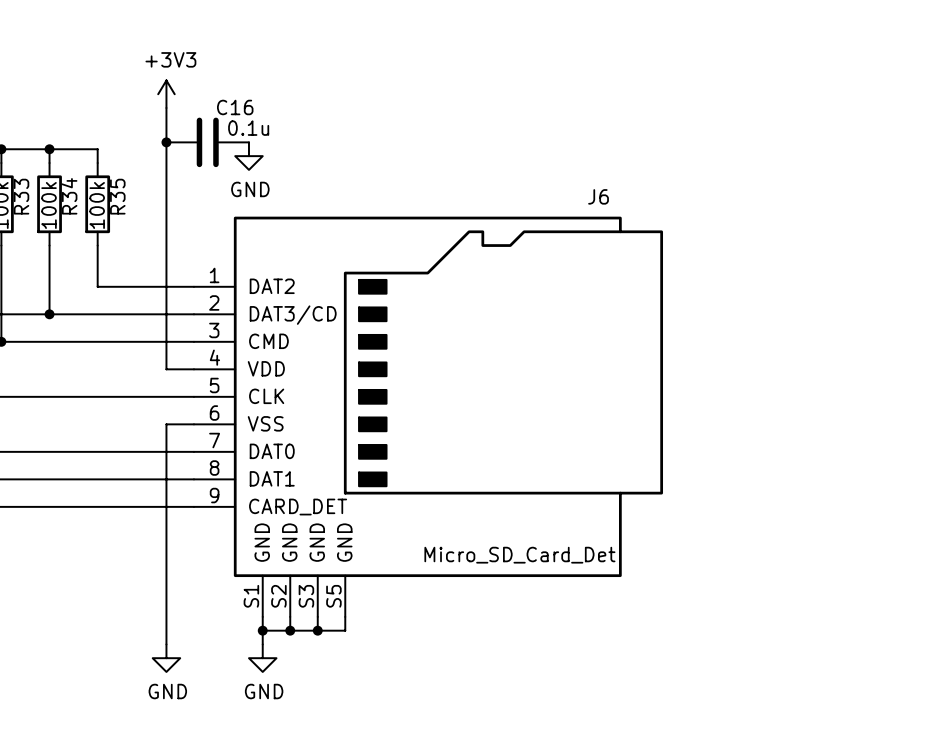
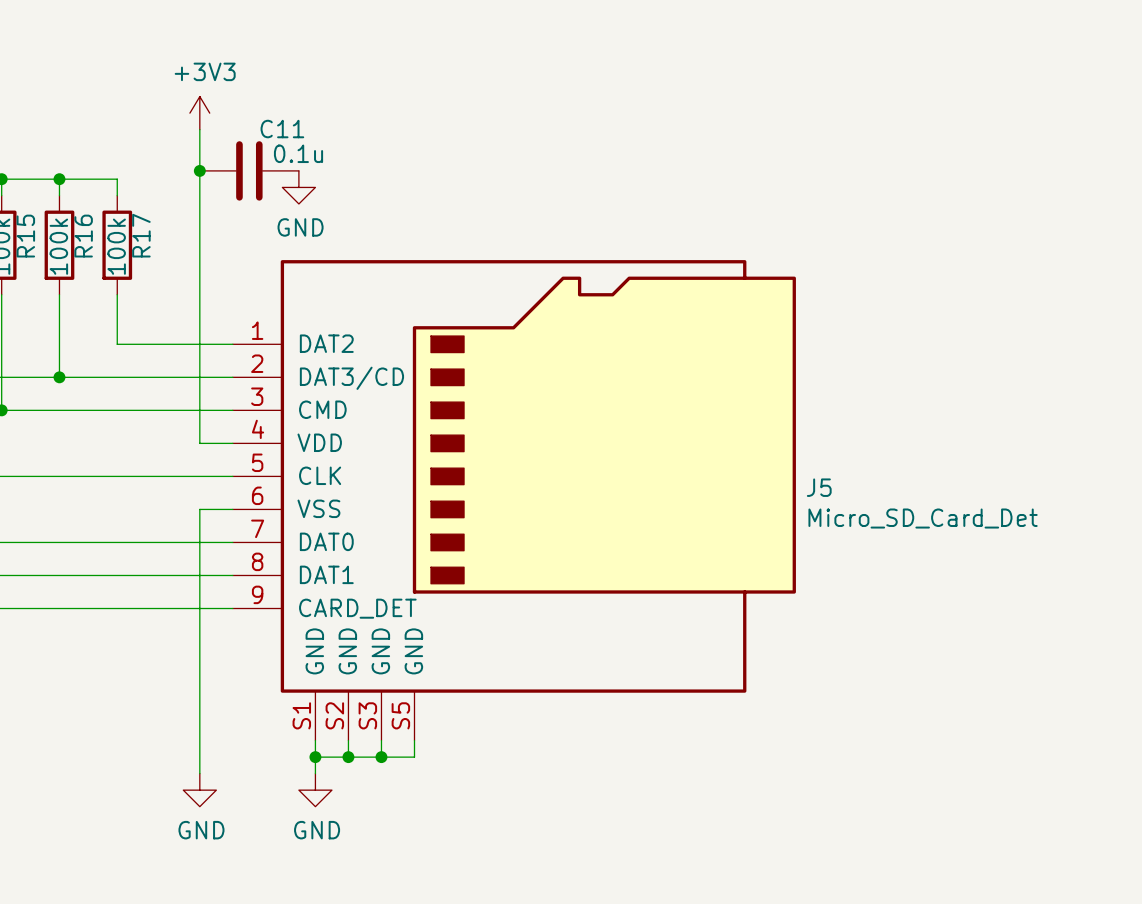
C16 name: C16 (235, 107) -> C11 (282, 129)
R33 name: R33 (21, 196) -> R15 (25, 236)
R34 name: R34 (69, 196) -> R16 (83, 236)
R35 name: R35 (117, 196) -> R17 (141, 235)
J6 name: J6 (598, 196) -> J5 (819, 487)
J6 value position: Micro_SD_Card_Det (519, 555) -> Micro_SD_Card_Det (923, 518)

